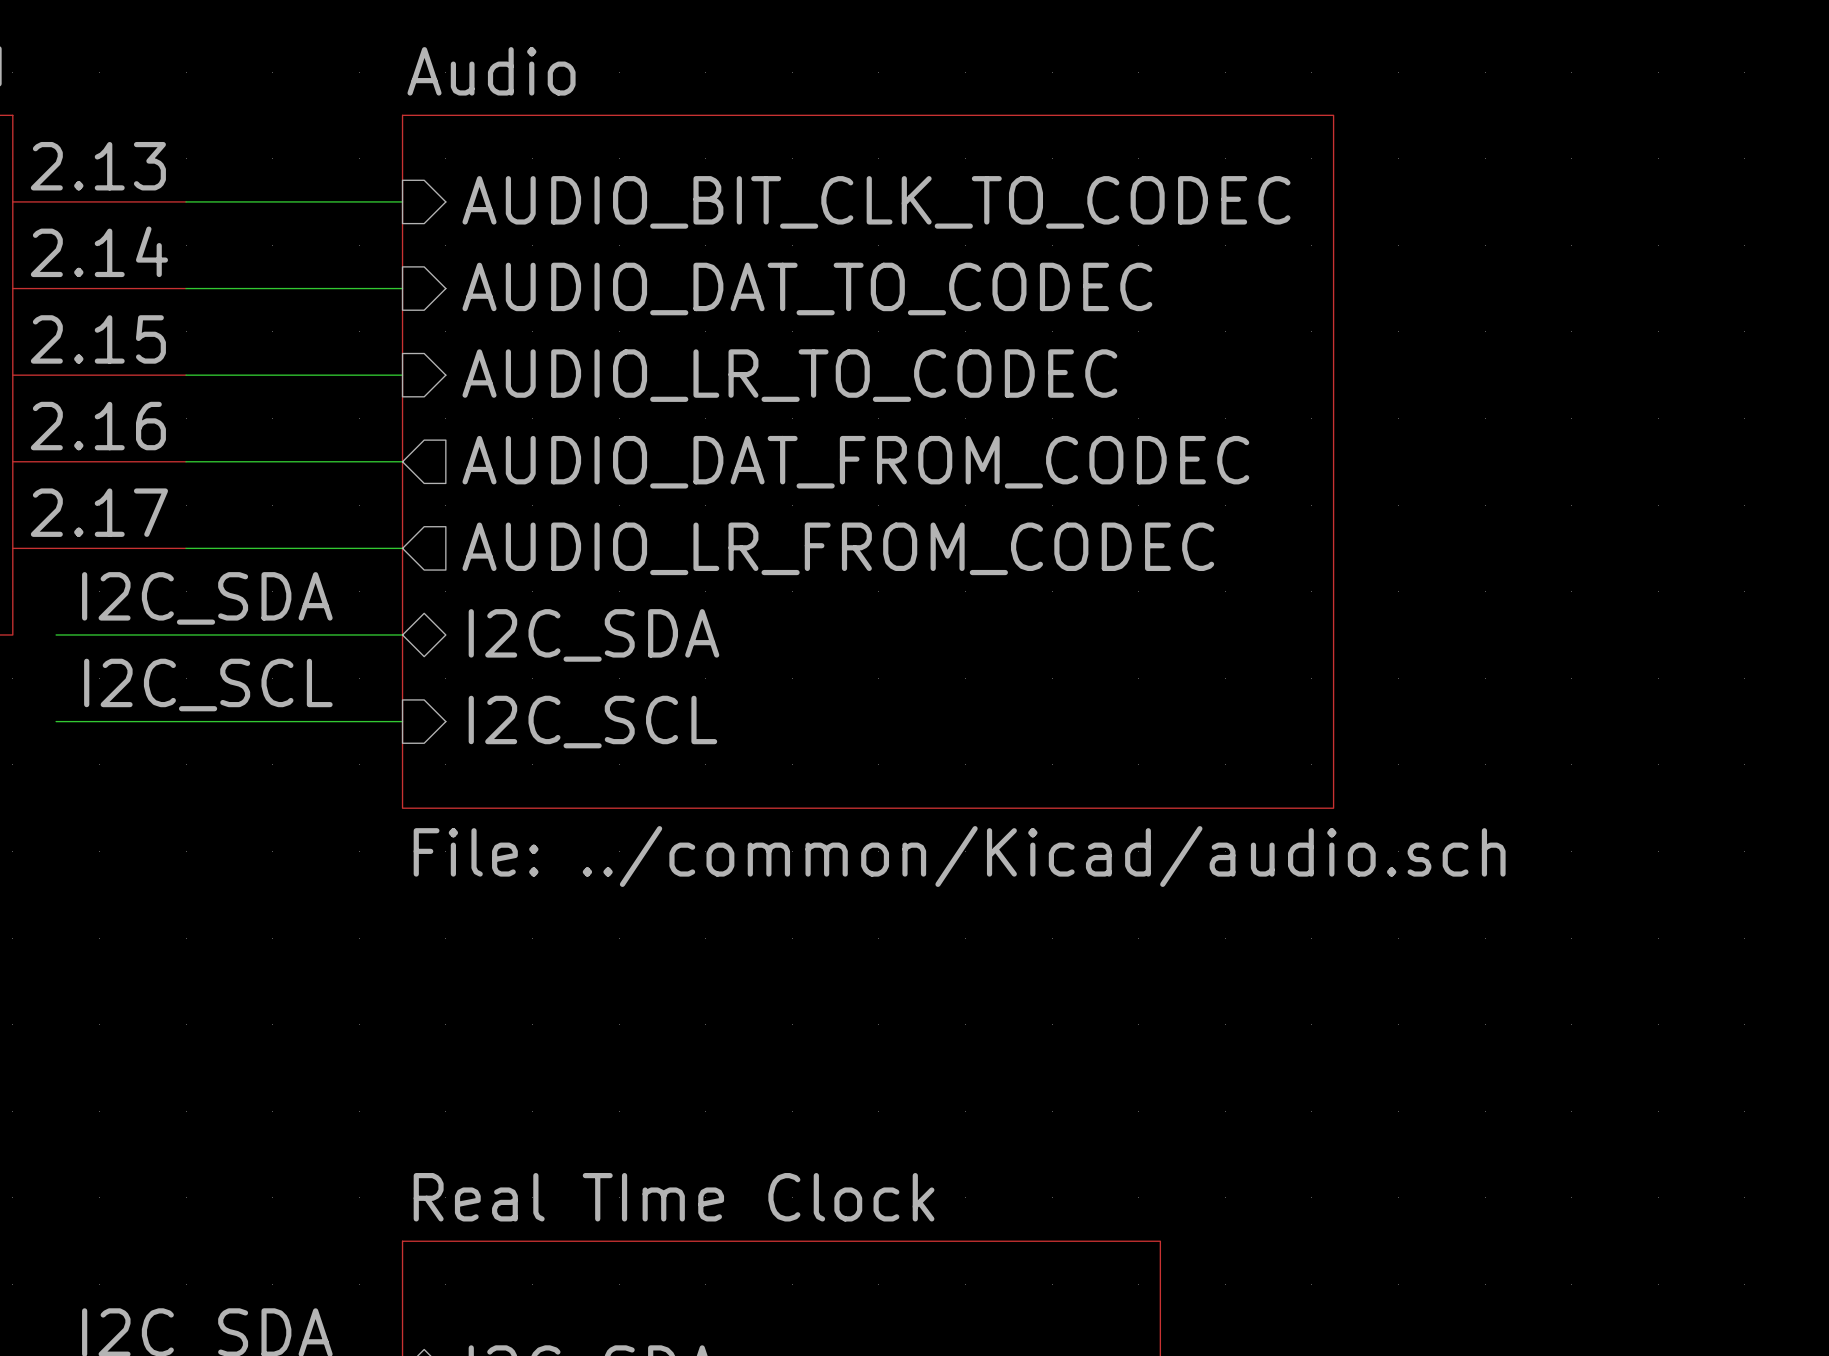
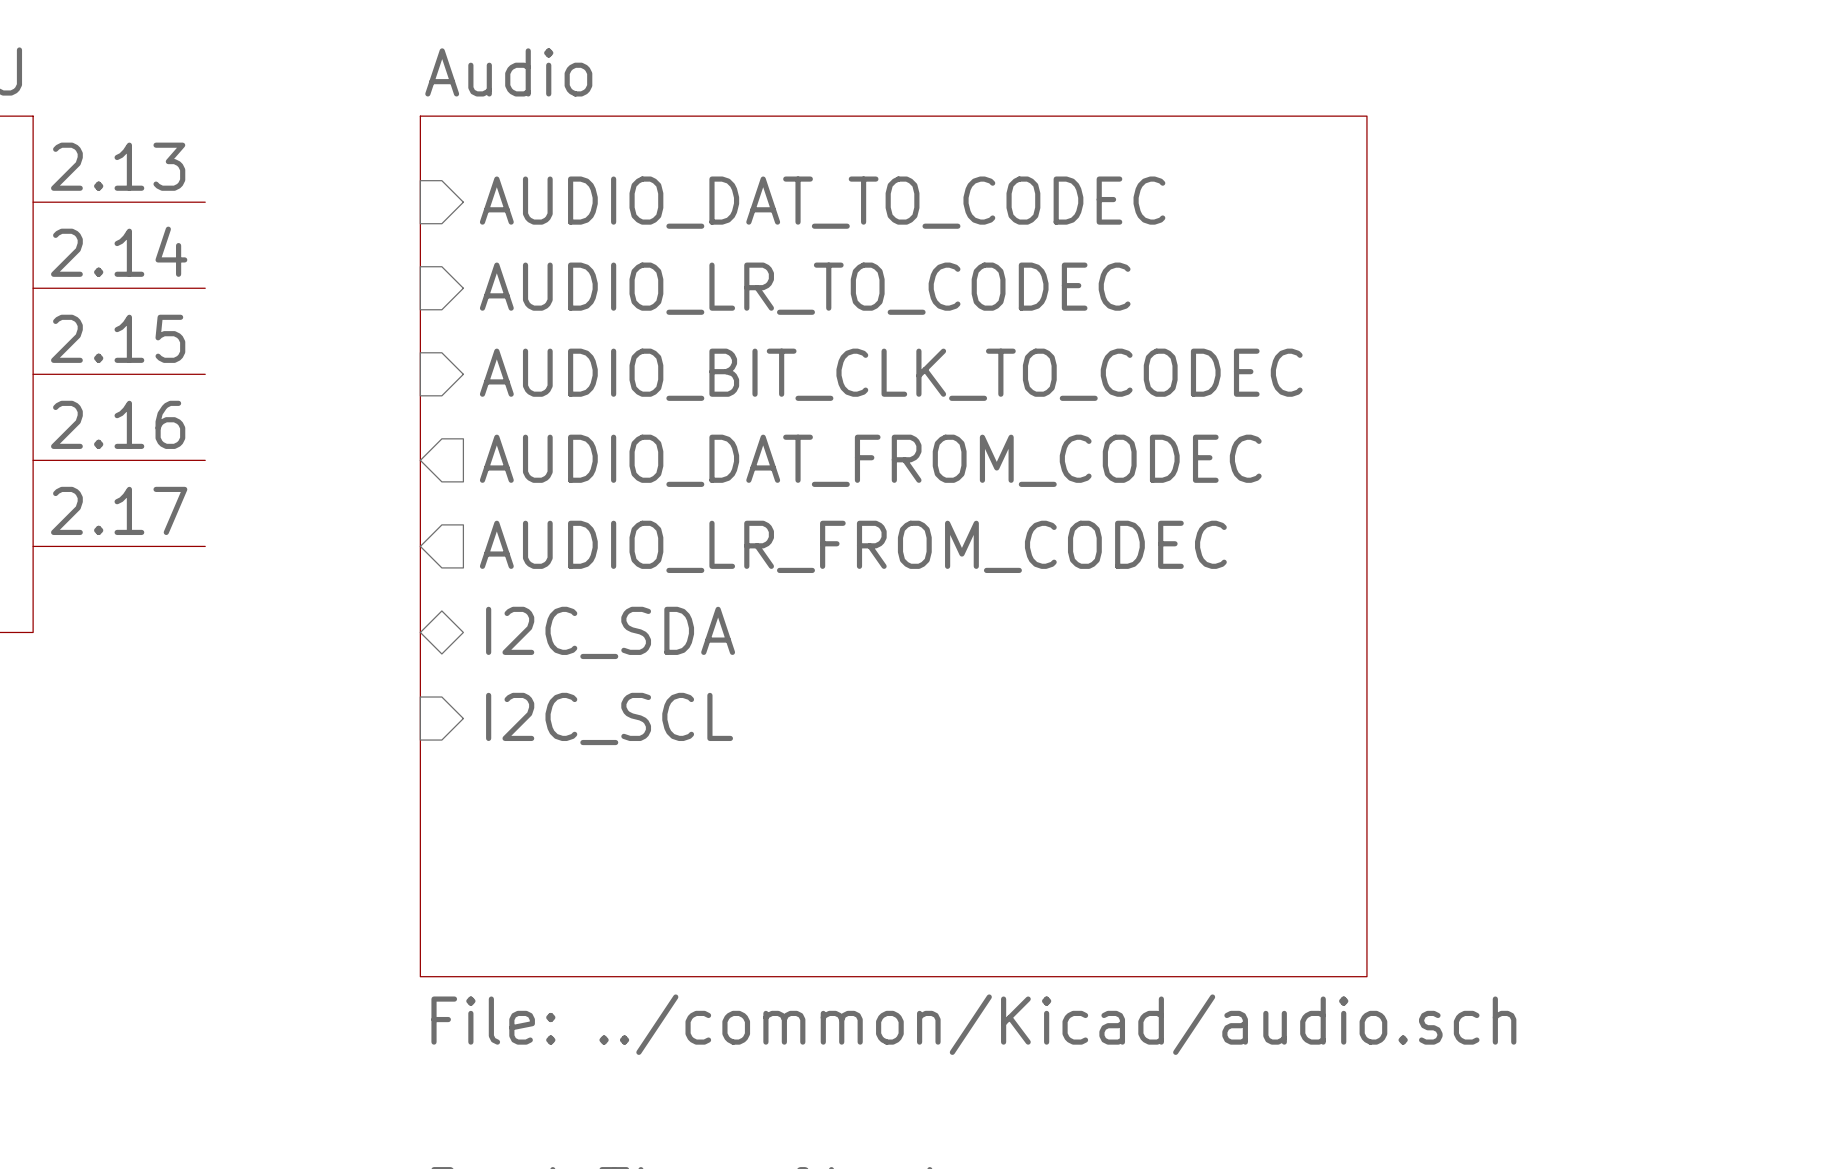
wire: (186, 201) (402, 201) -> none
sheet pin: AUDIO_BIT_CLK_TO_CODEC (876, 202) -> AUDIO_DAT_TO_CODEC (822, 202)
wire: (186, 288) (402, 288) -> none
sheet pin: AUDIO_DAT_TO_CODEC (807, 289) -> AUDIO_LR_TO_CODEC (805, 288)
wire: (186, 375) (402, 375) -> none
sheet pin: AUDIO_LR_TO_CODEC (789, 375) -> AUDIO_BIT_CLK_TO_CODEC (891, 374)
wire: (186, 461) (402, 461) -> none
sheet Audio: File: ../common/Kicad/audio.sch (868, 461) -> none
wire: (186, 548) (402, 548) -> none
sheet Audio: none -> File: ../common/Kicad/audio.sch (893, 546)
label: I2C_SDA (207, 598) -> none
wire: (56, 634) (402, 634) -> none
label: I2C_SCL (208, 685) -> none
wire: (56, 721) (402, 721) -> none

